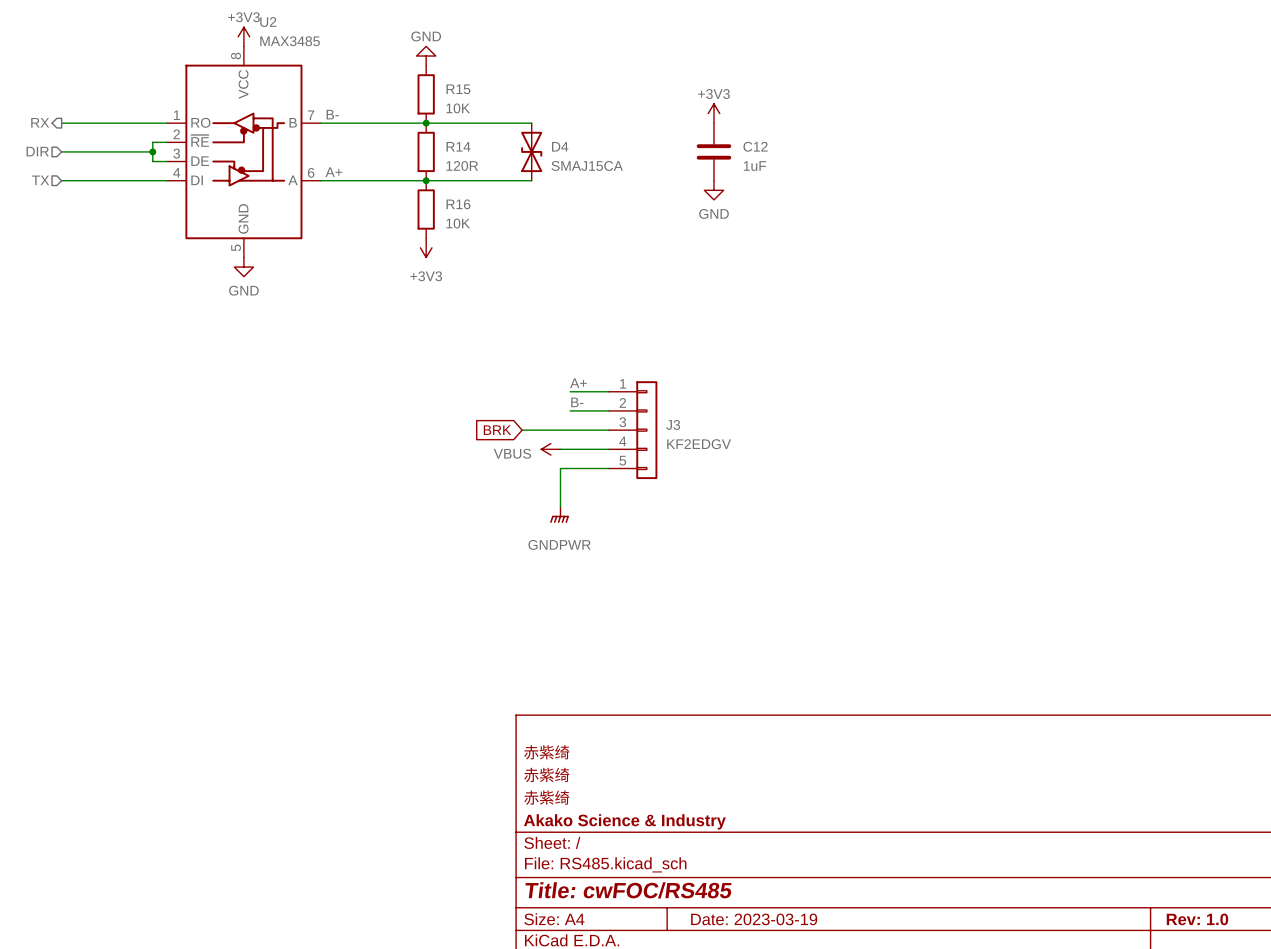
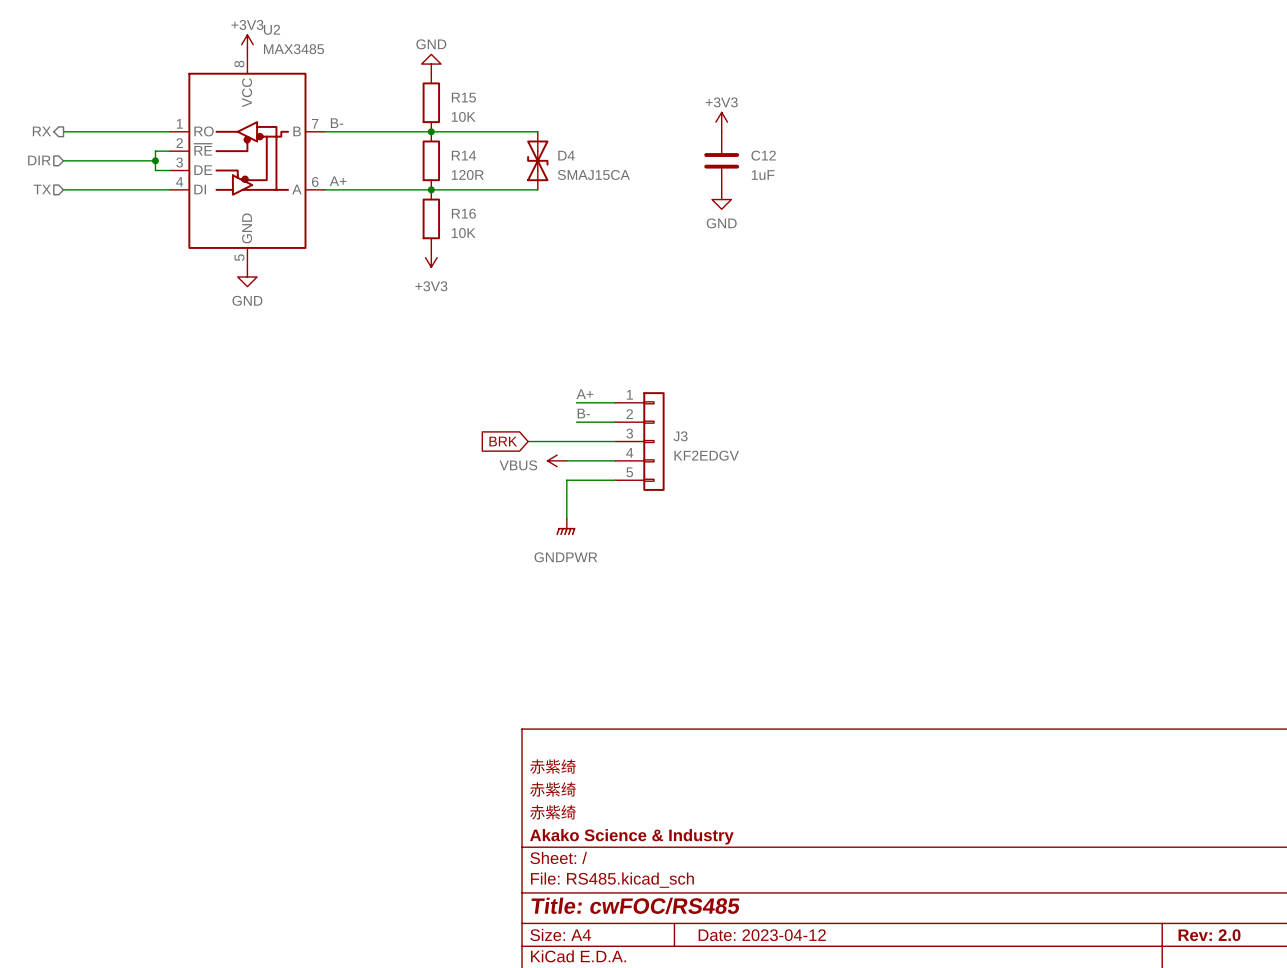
title block: Date: 2023-03-19 (754, 919) -> Date: 2023-04-12 (762, 935)
title block: Rev: 1.0 (1197, 919) -> Rev: 2.0 (1209, 935)

